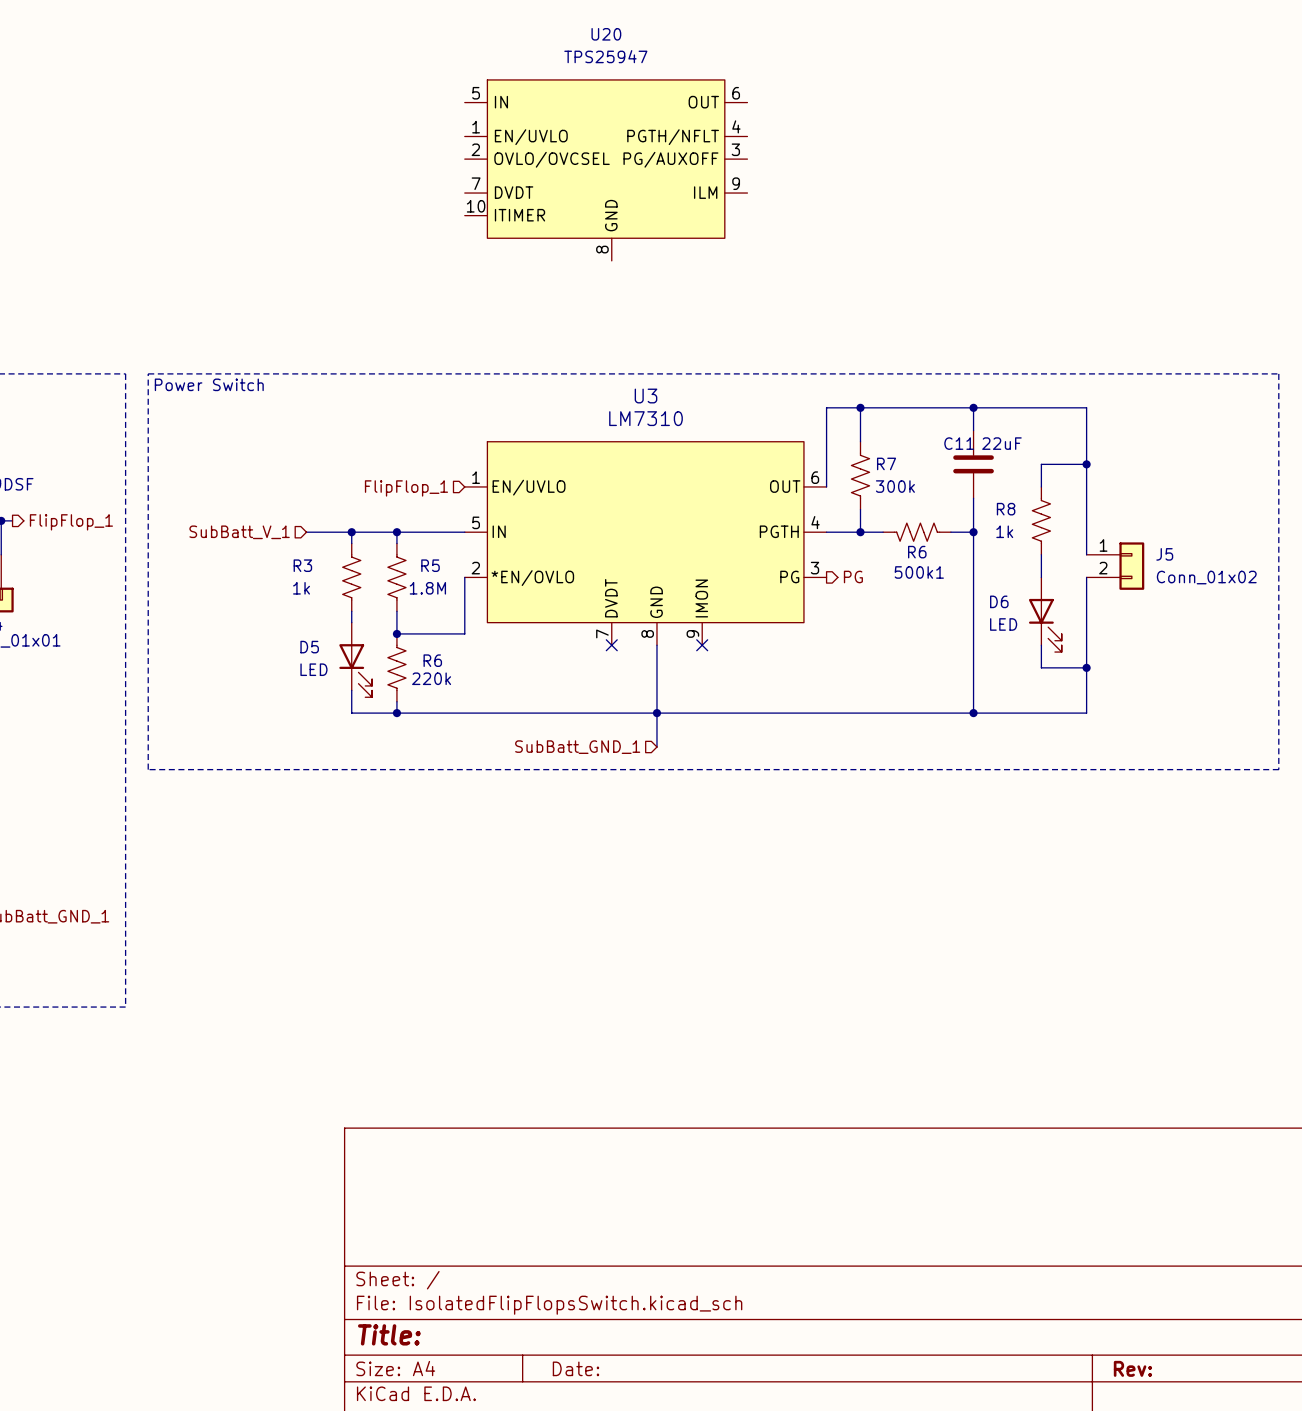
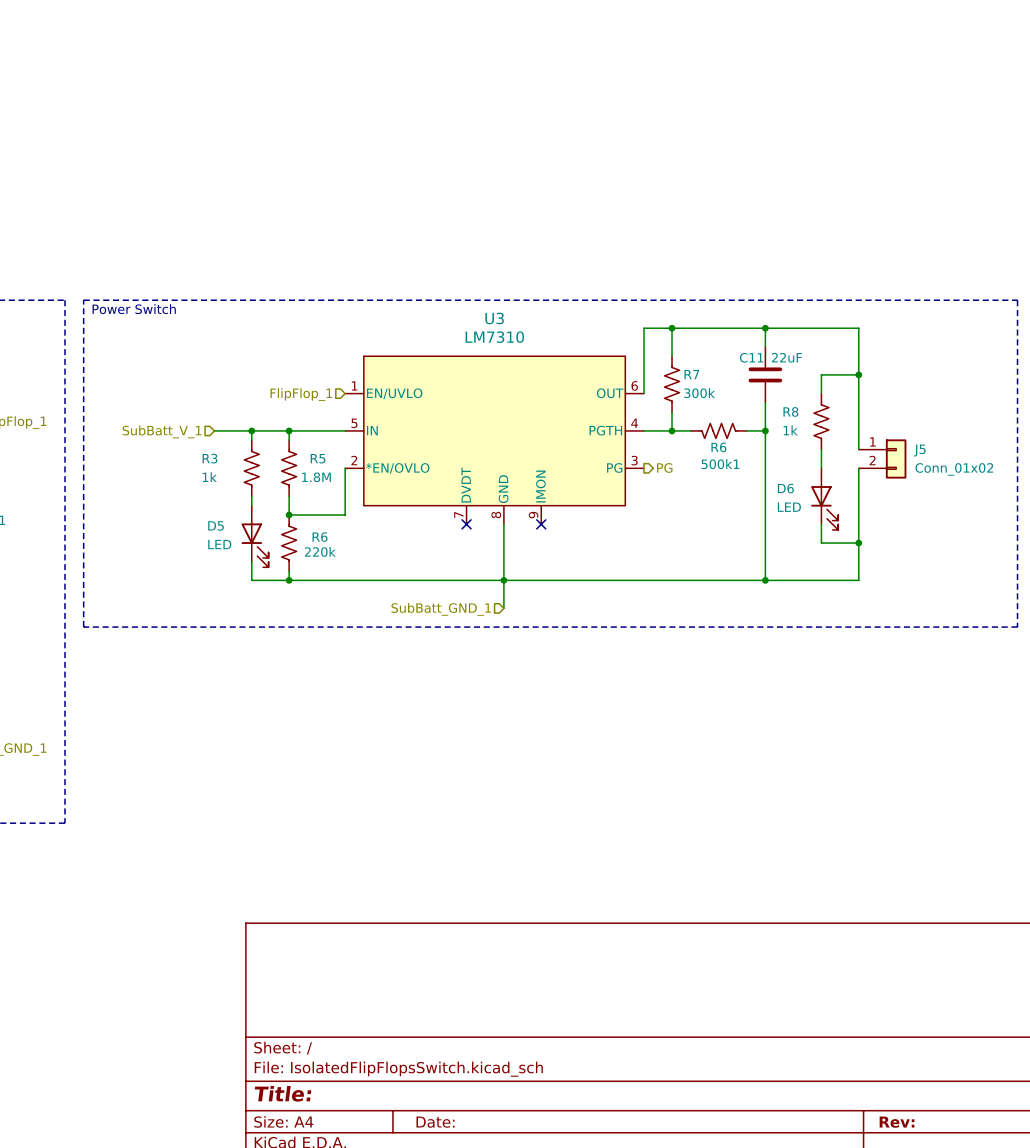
U20: TPS25947 (606, 170) -> none

